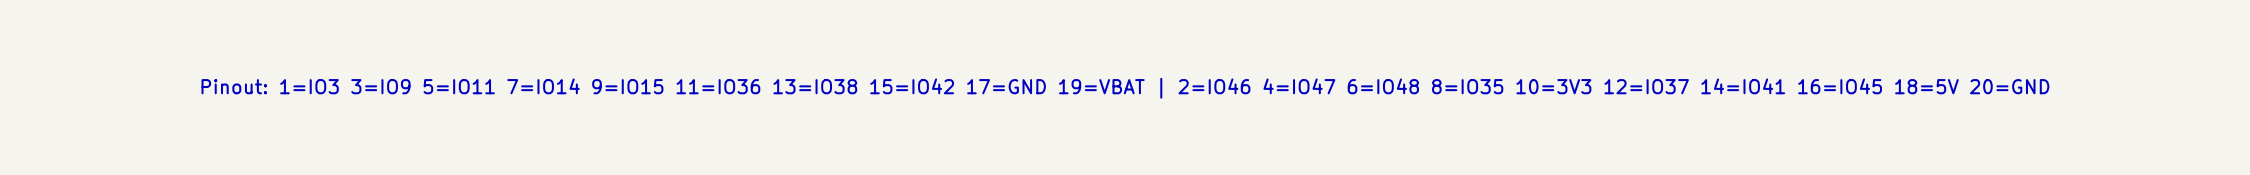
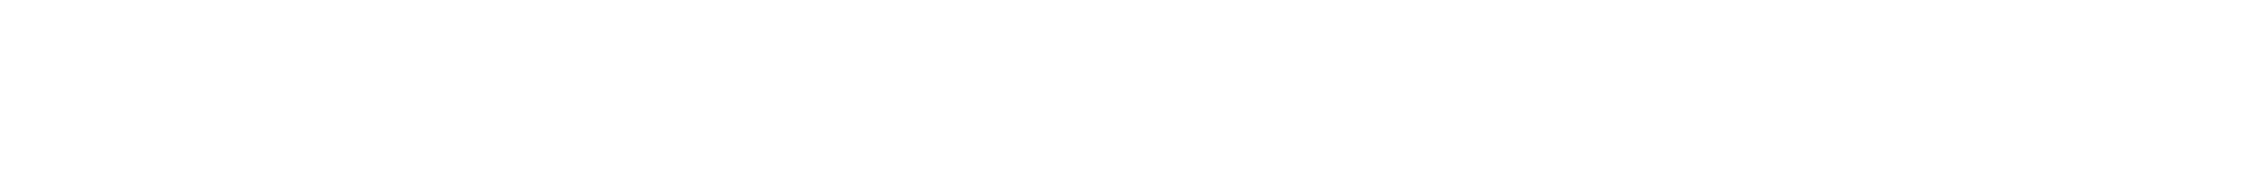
text: Pinout: 1=IO3 3=IO9 5=IO11 7=IO14 9=IO15 11=IO36 13=IO38 15=IO42 17=GND 19=VBAT | 2=IO46 4=IO47 6=IO48 8=IO35 10=3V3 12=IO37 14=IO41 16=IO45 18=5V 20=GND (1125, 88) -> none

